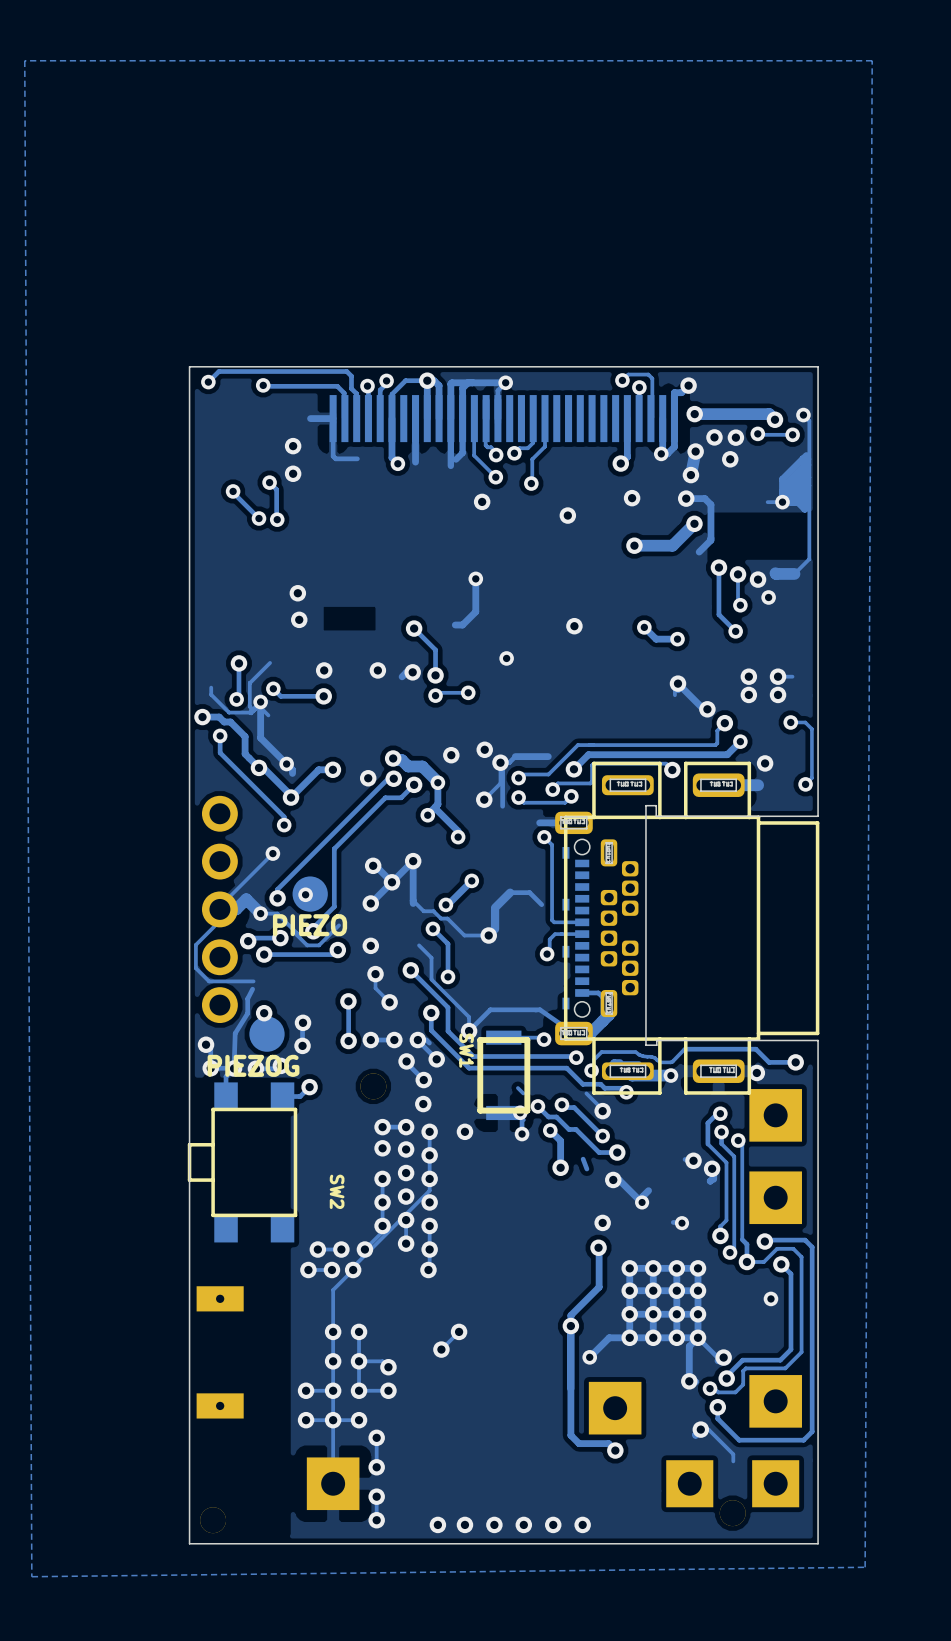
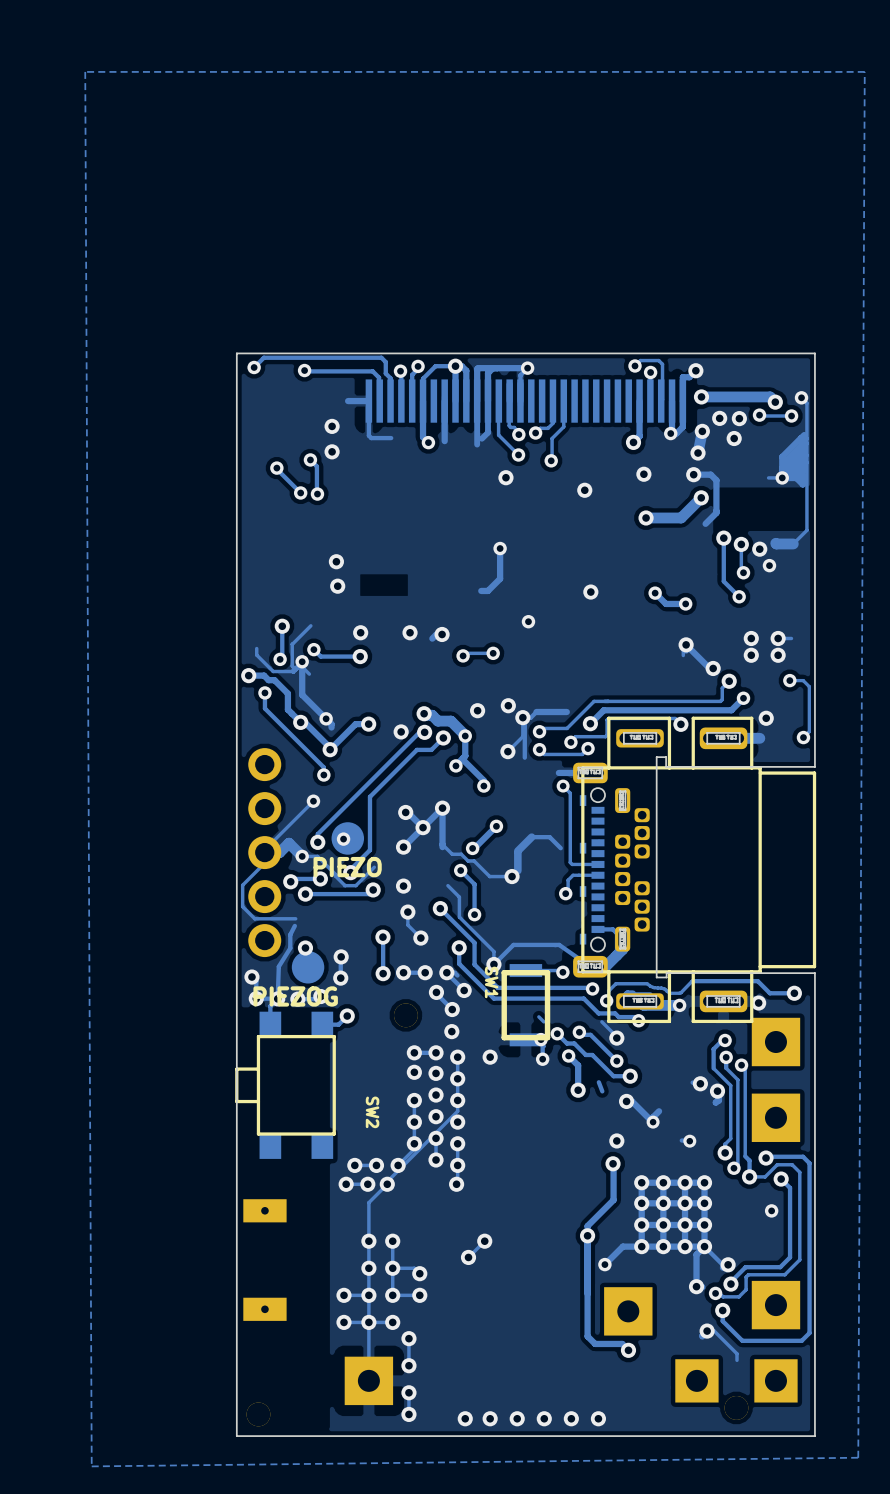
track: (414, 628) (435, 649) (435, 675) -> none
via: (414, 628) -> none
via: (435, 675) -> none

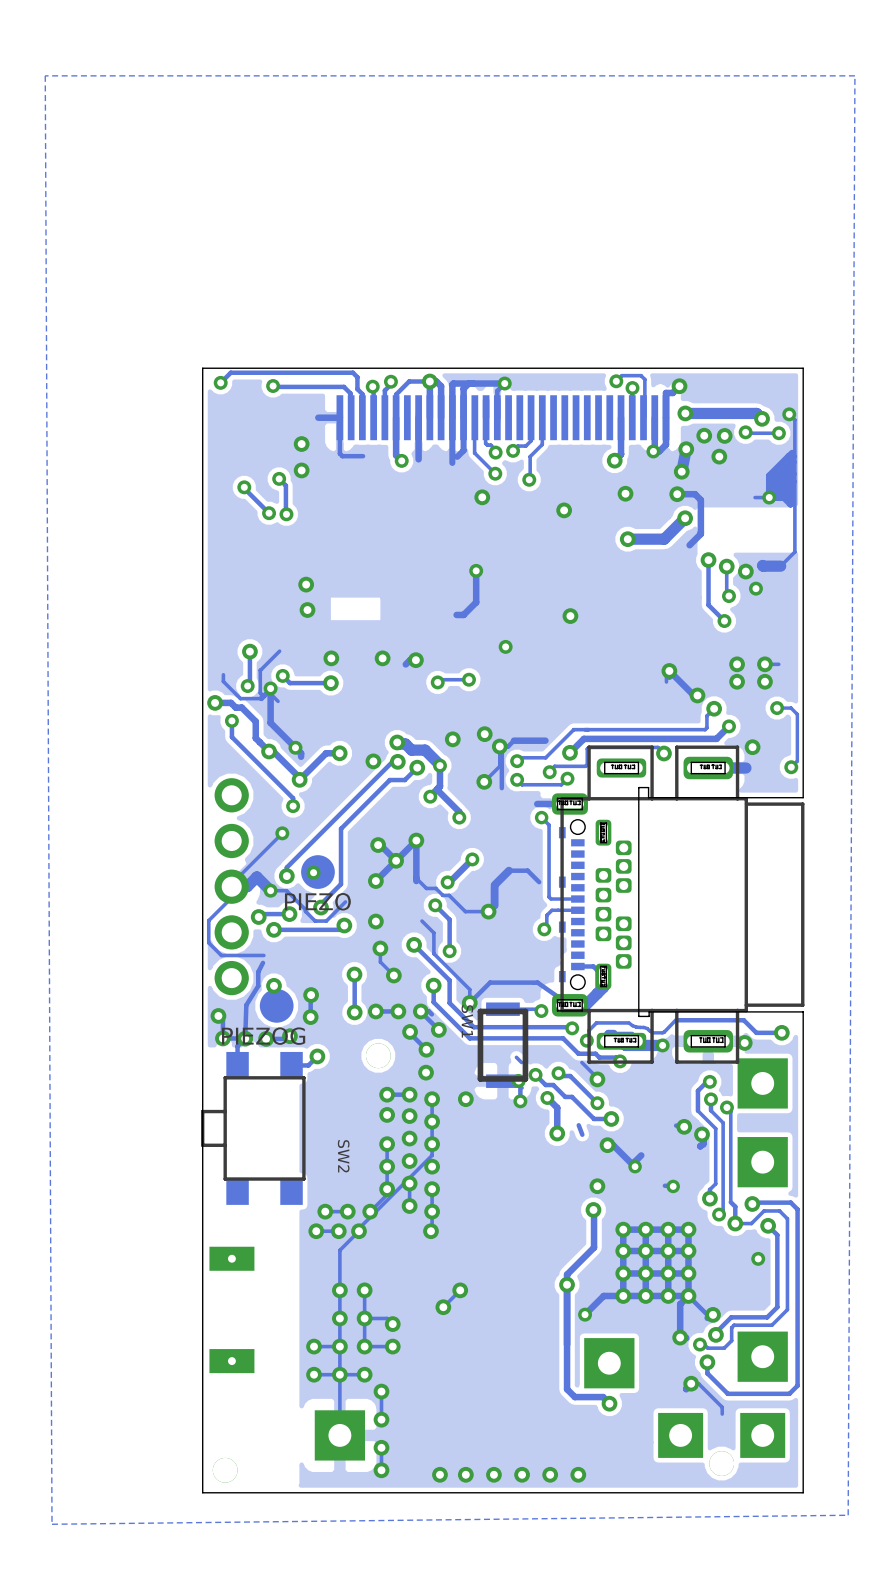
track: (655, 593) (665, 603) (685, 603) -> none
via: (655, 593) -> none
via: (685, 603) -> none

